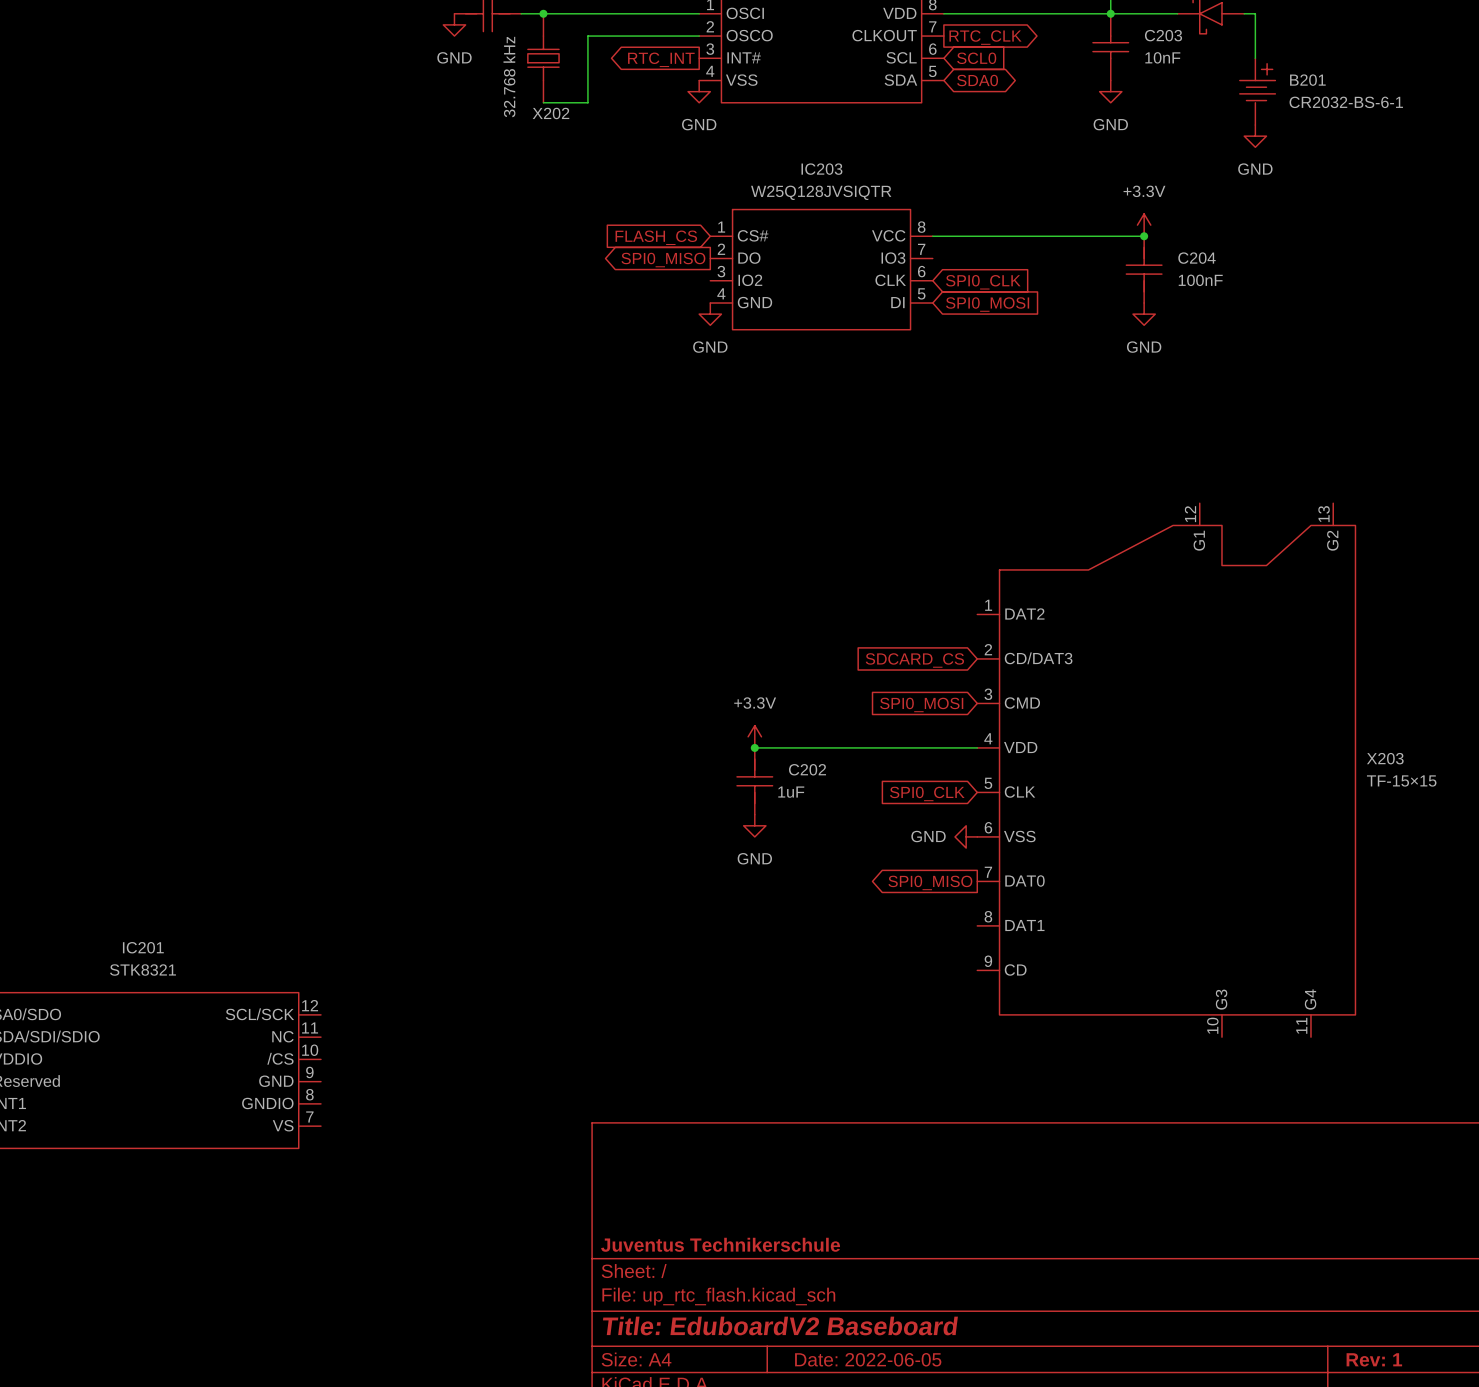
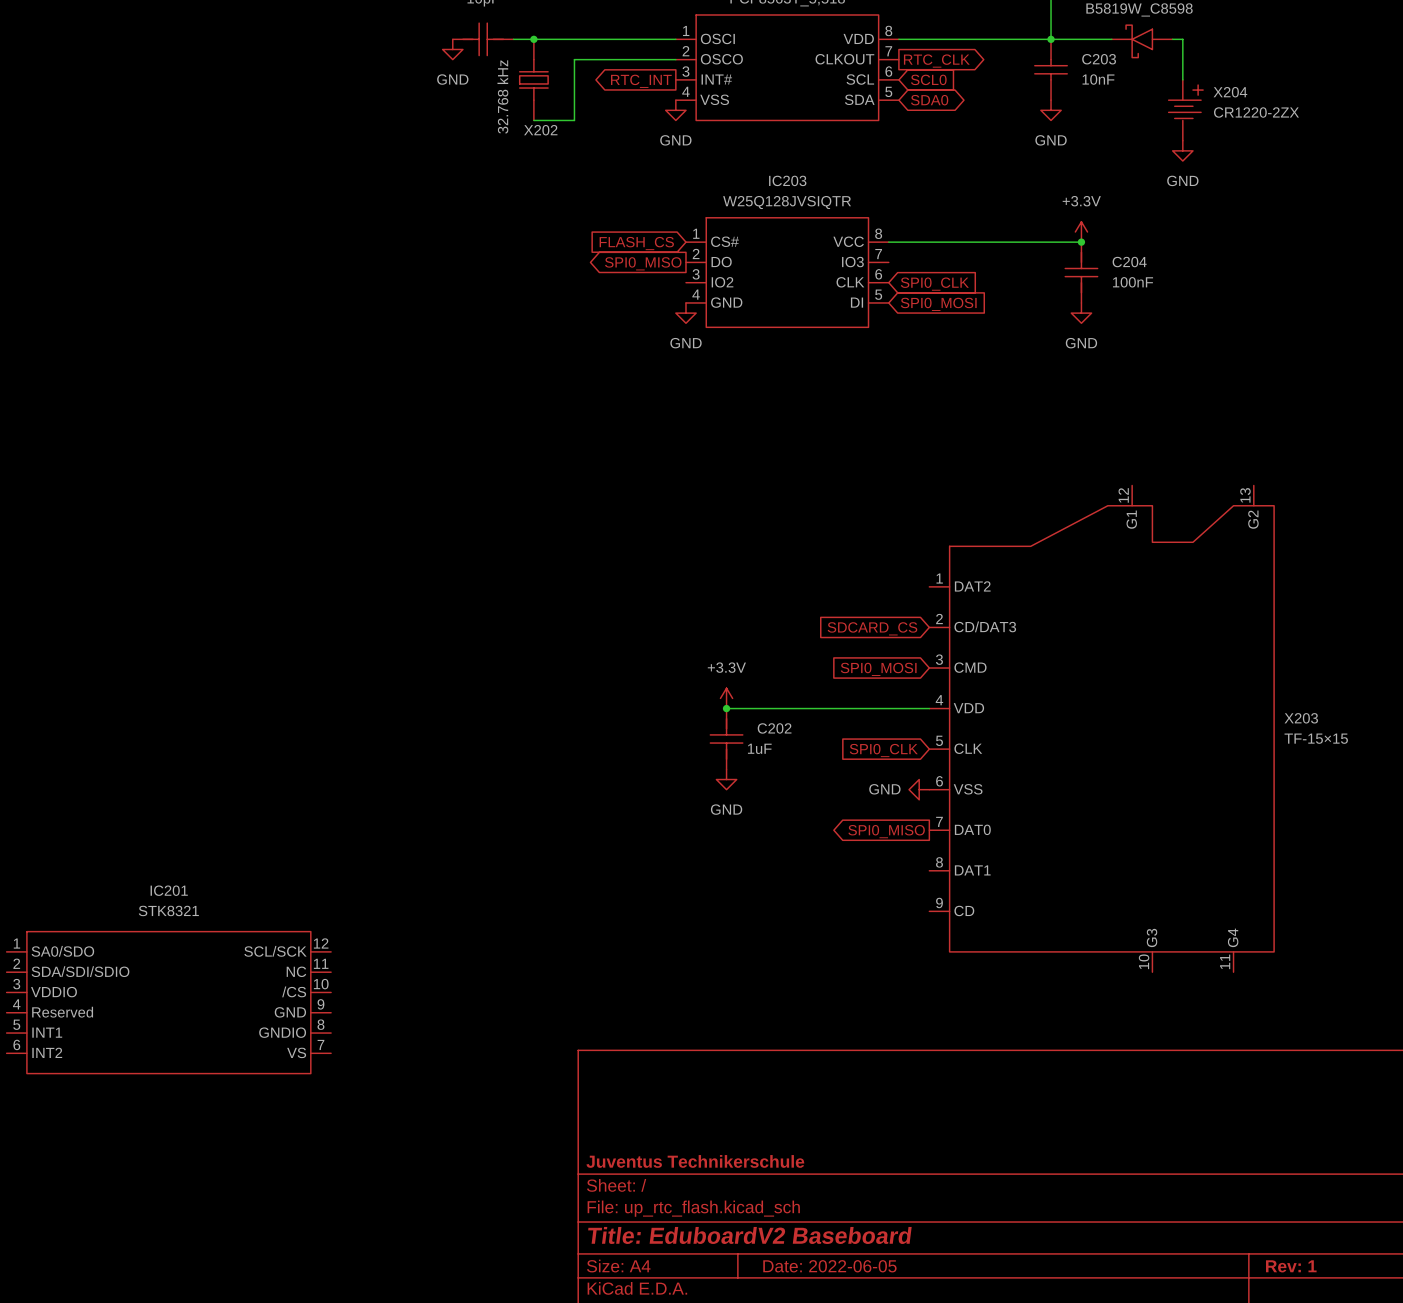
B201: CR2032-BS-6-1 (1257, 91) -> none
X204: none -> CR1220-2ZX (1185, 110)

